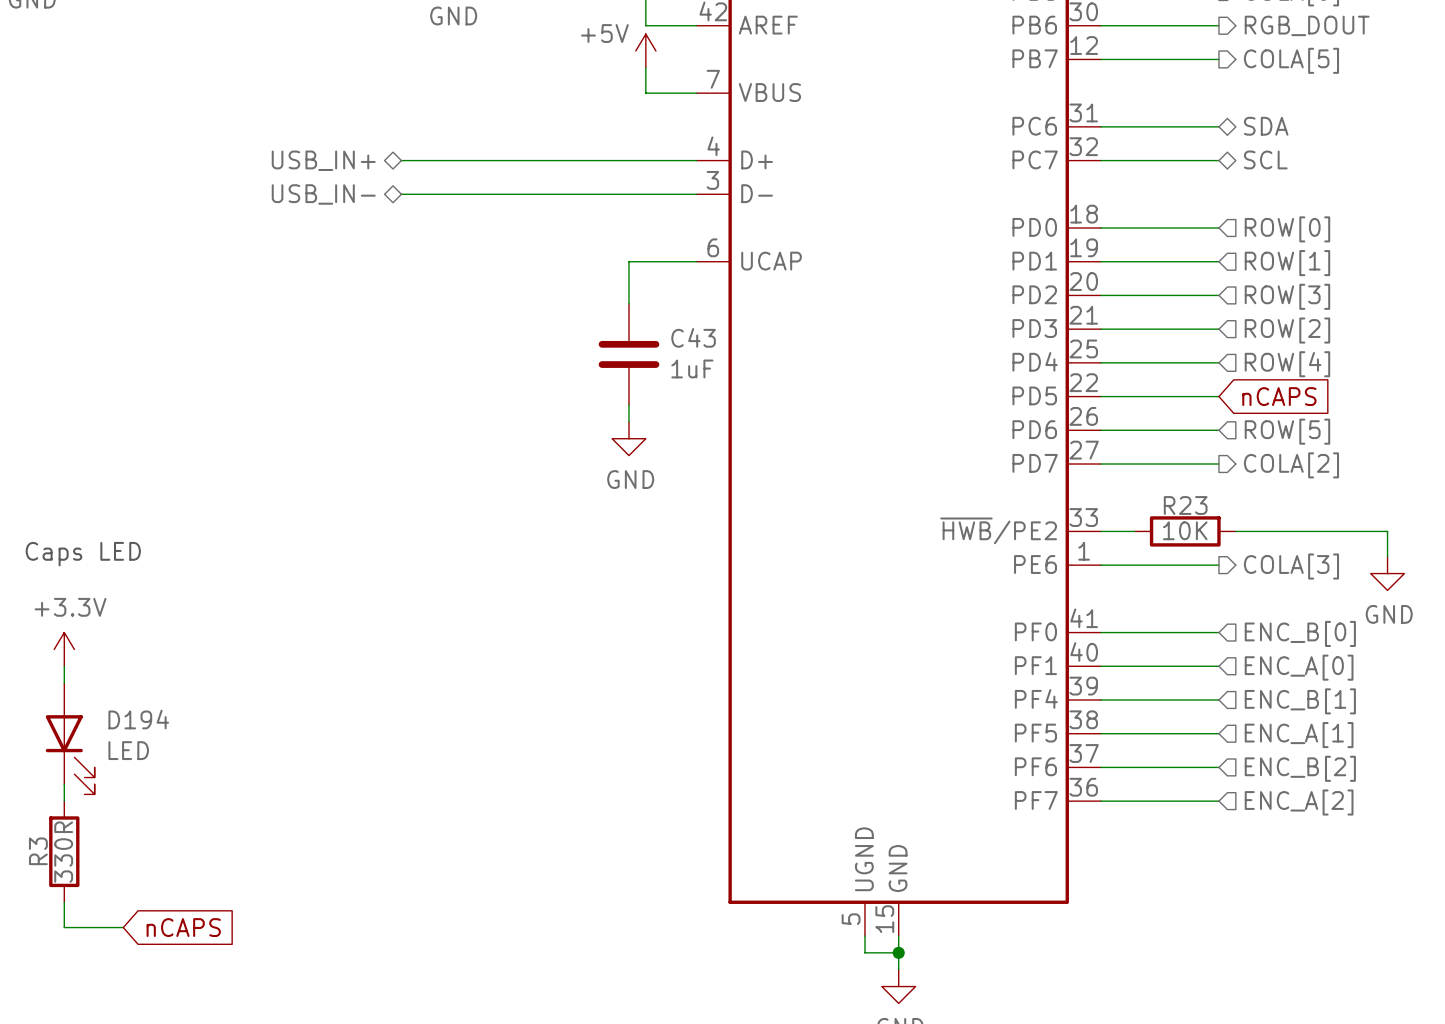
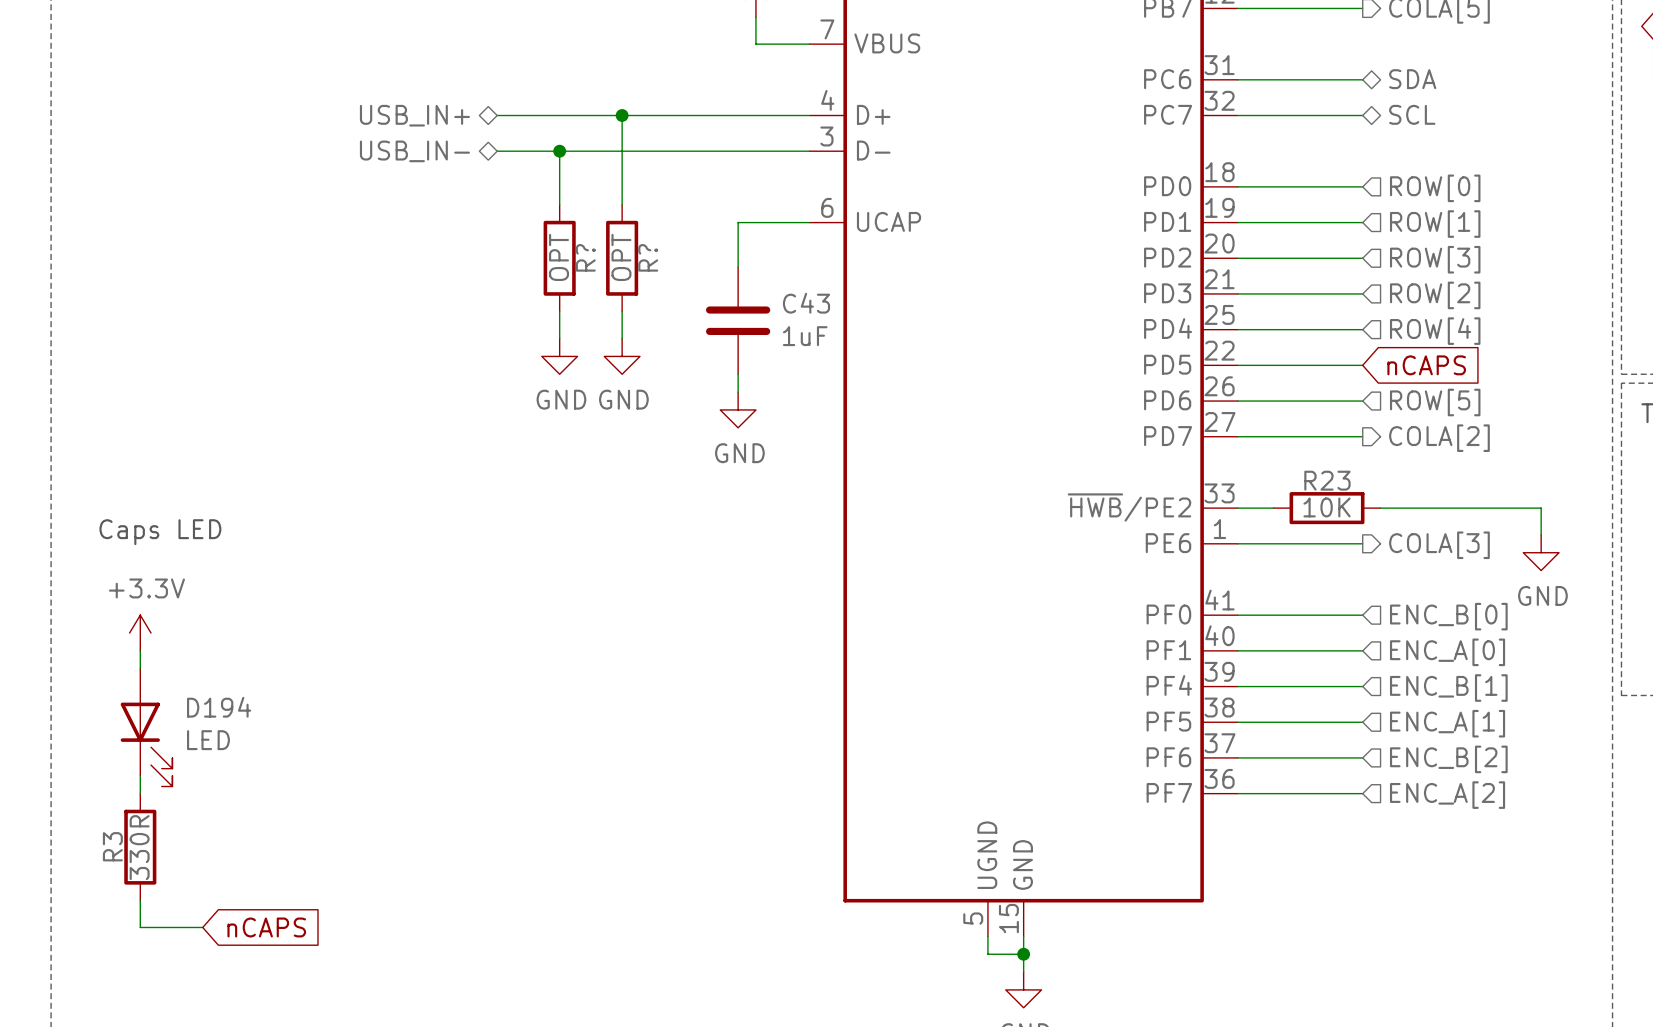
wire: none -> (622, 115) (622, 204)
junction: none -> (622, 115)
wire: none -> (559, 151) (559, 204)
junction: none -> (559, 151)
R?: none -> OPT (559, 258)
R?: none -> OPT (622, 258)
wire: none -> (559, 311) (559, 338)
wire: none -> (622, 311) (622, 338)
power symbol: none -> GND (559, 356)
power symbol: none -> GND (622, 356)

